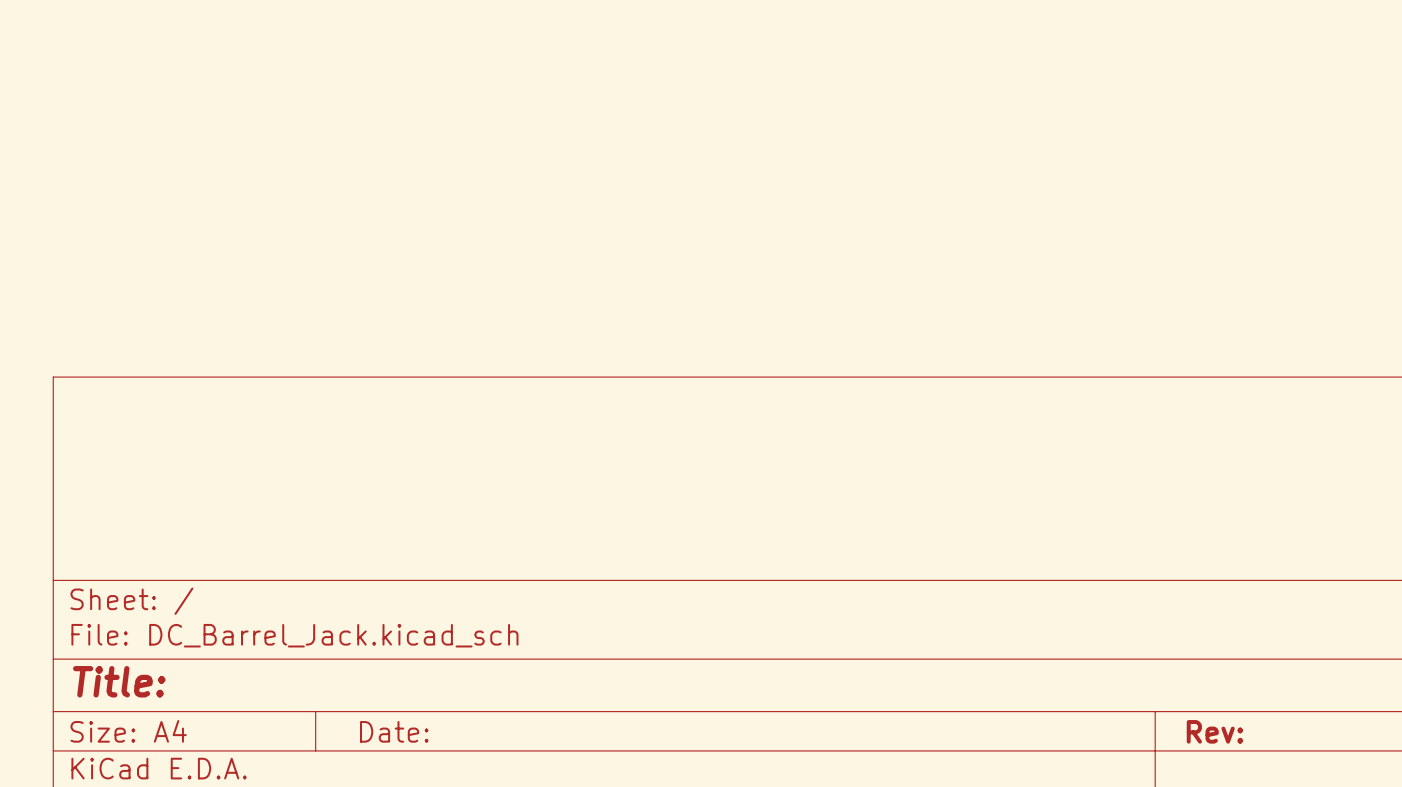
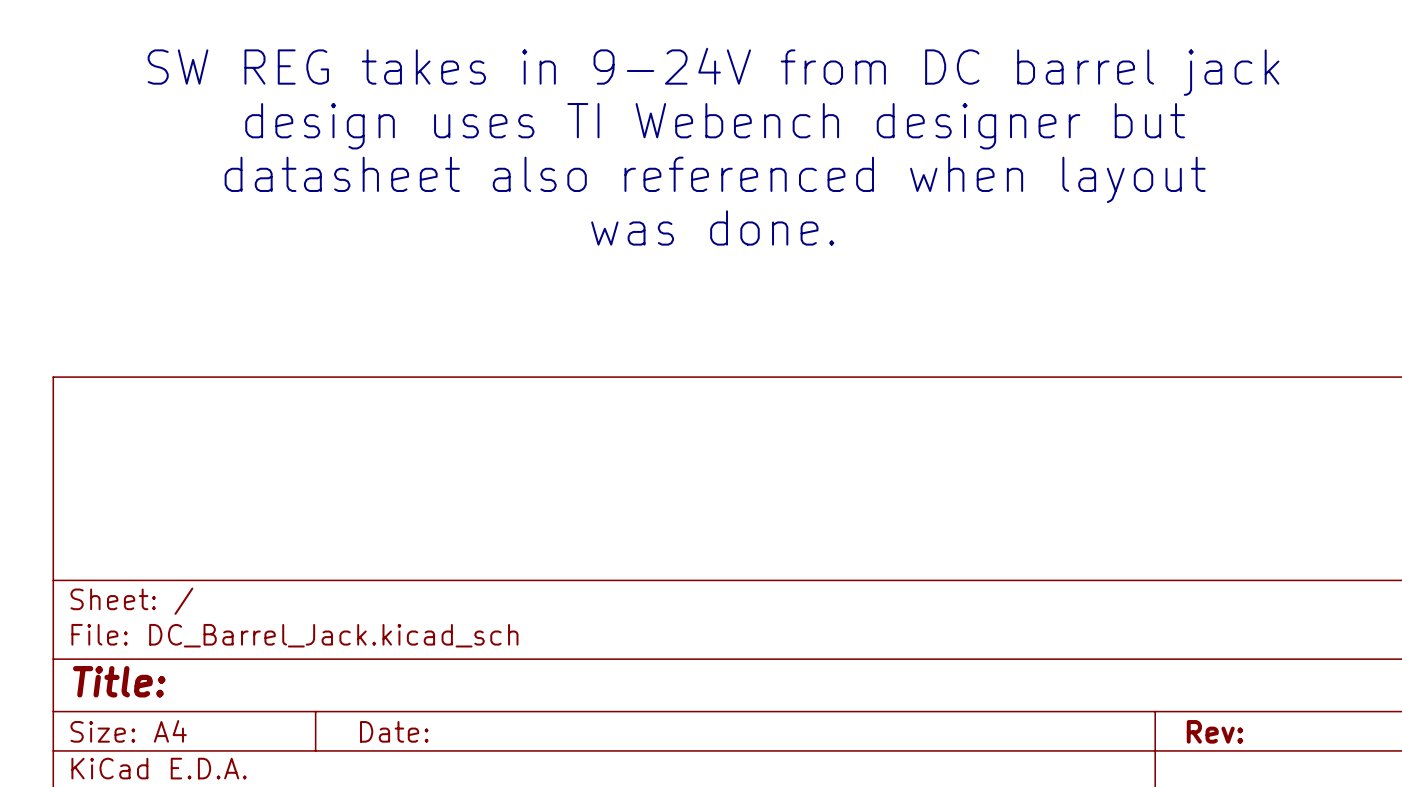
text: none -> SW REG takes in 9-24V from DC barrel jack (713, 71)
text: none -> design uses TI Webench designer but (715, 126)
text: none -> datasheet also referenced when layout (715, 179)
text: none -> was done. (712, 227)

